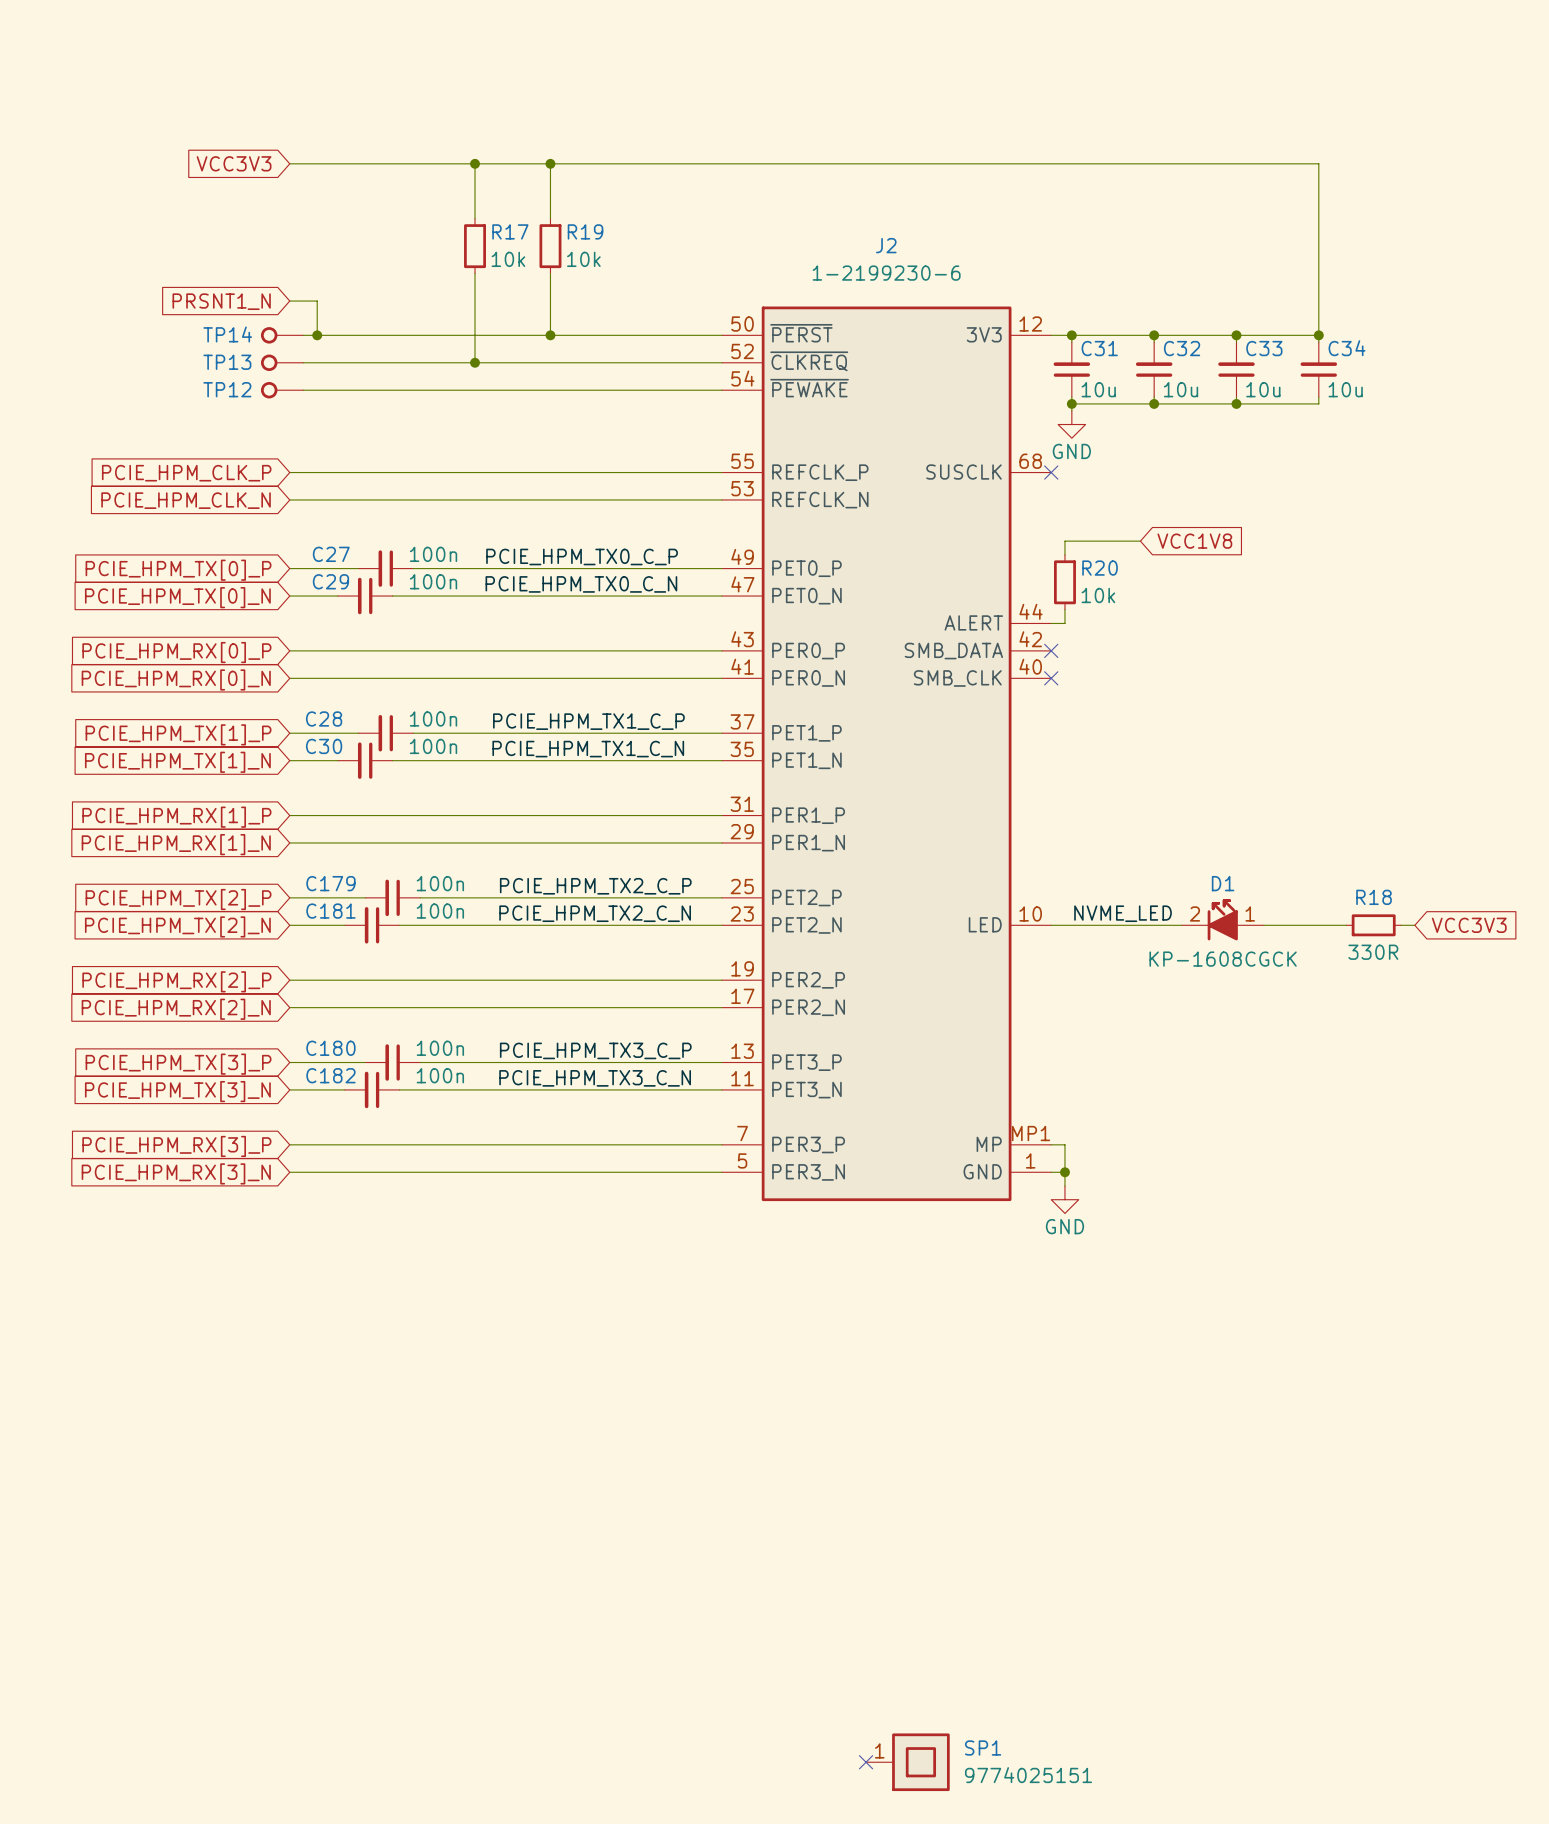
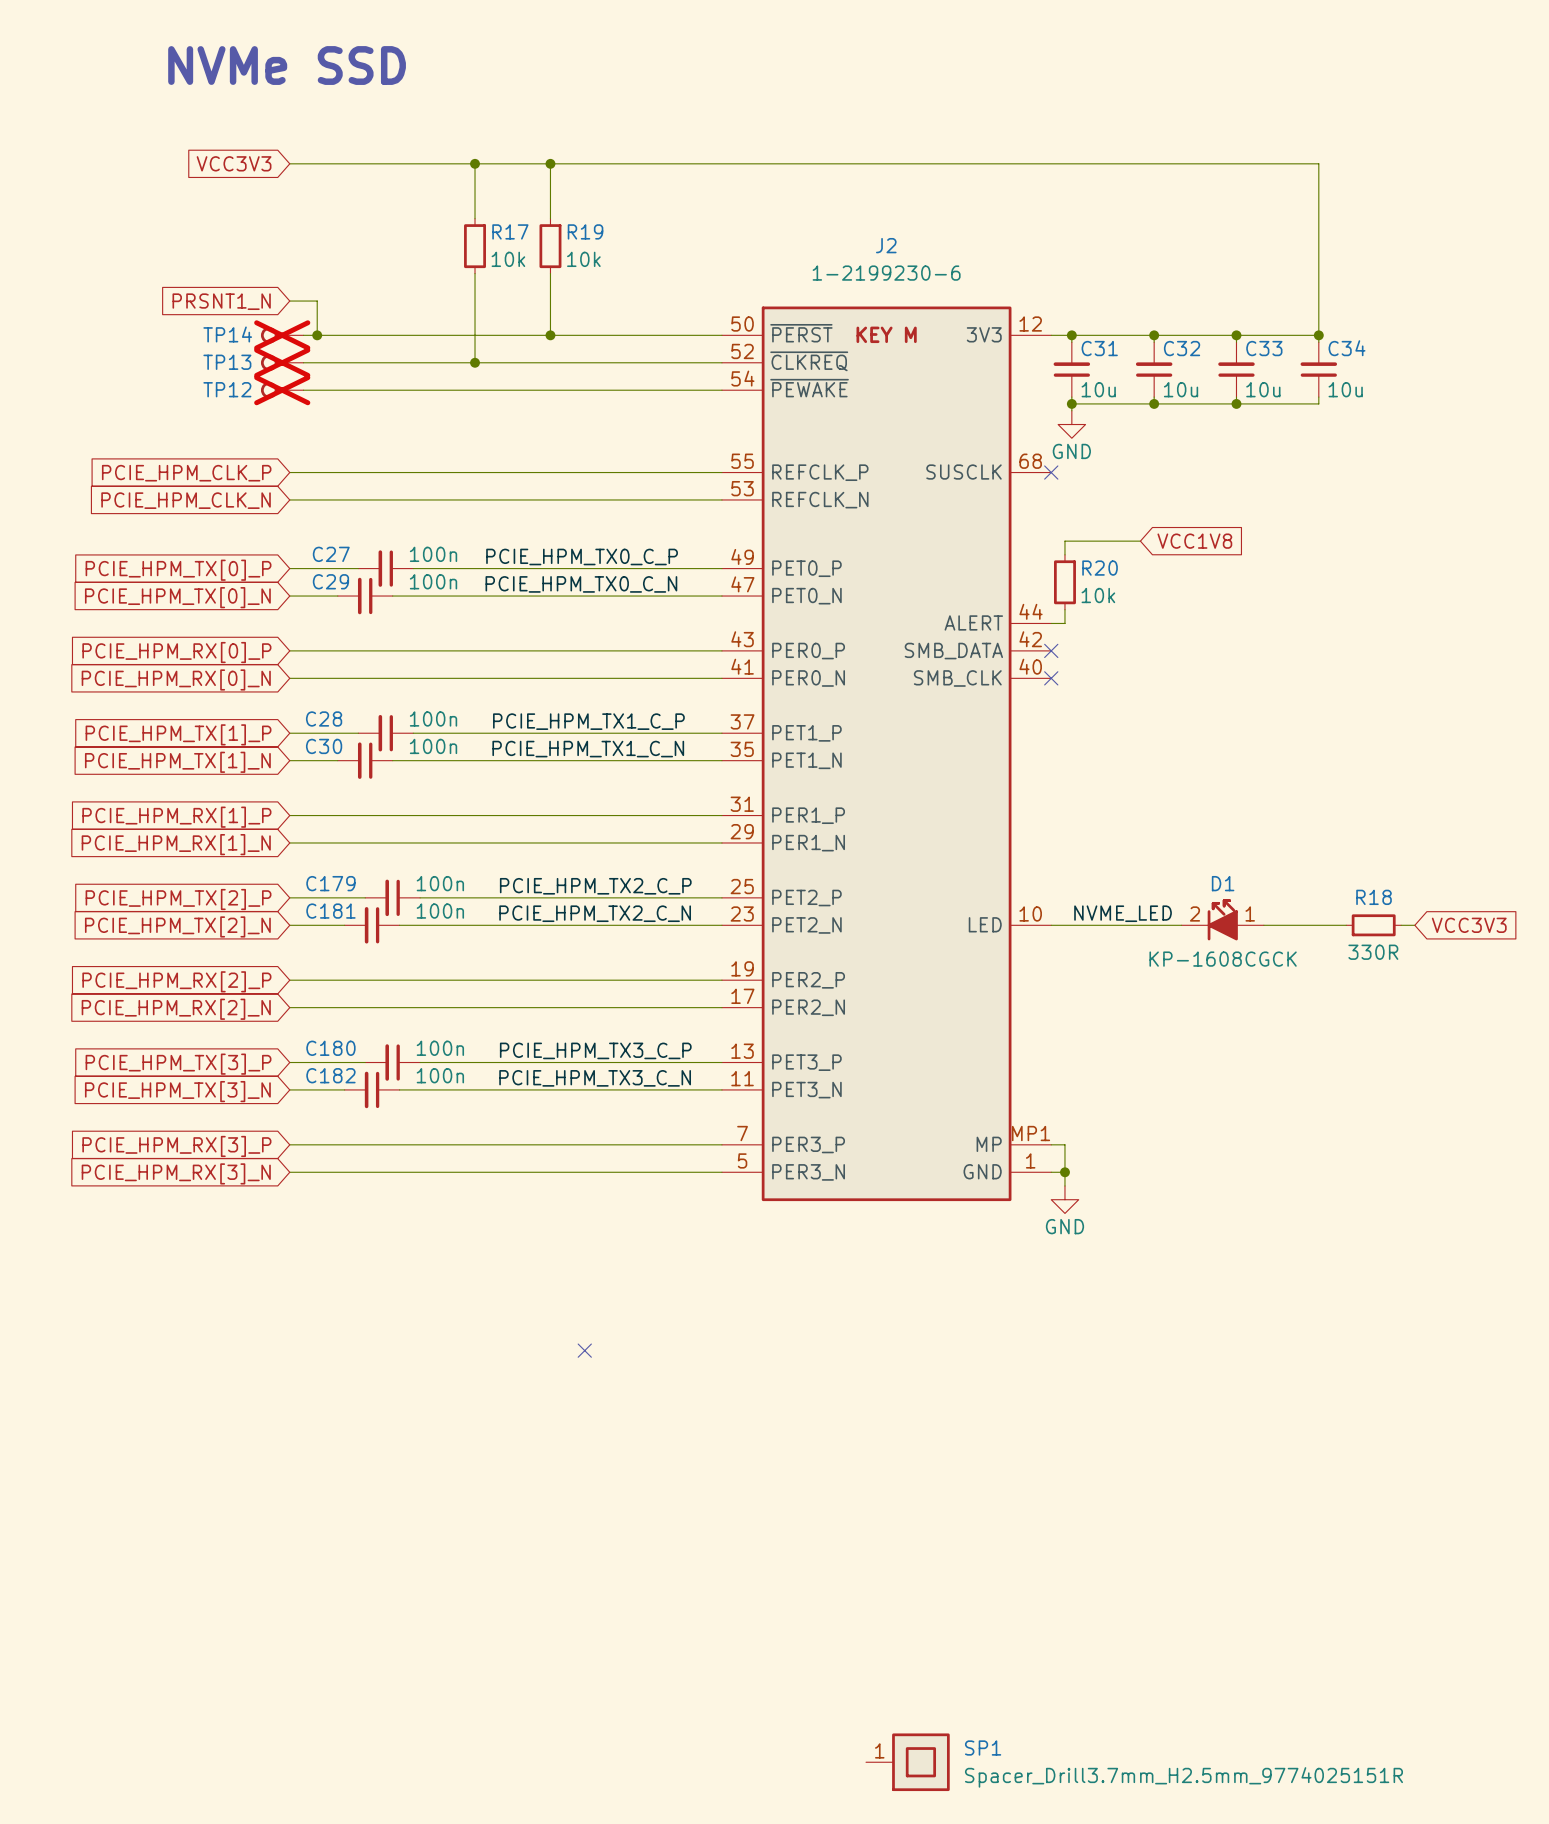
text: none -> NVMe SSD (287, 65)
J2 text: none -> KEY M (886, 334)
TP14 do-not-place cross: none -> (282, 335)
TP13 do-not-place cross: none -> (282, 362)
TP12 do-not-place cross: none -> (282, 390)
no-connect mark: none -> (584, 1350)
no-connect mark: (866, 1762) -> none
SP1 text: 9774025151 (1028, 1775) -> none
SP1 value: none -> Spacer_Drill3.7mm_H2.5mm_9774025151R (1183, 1777)

